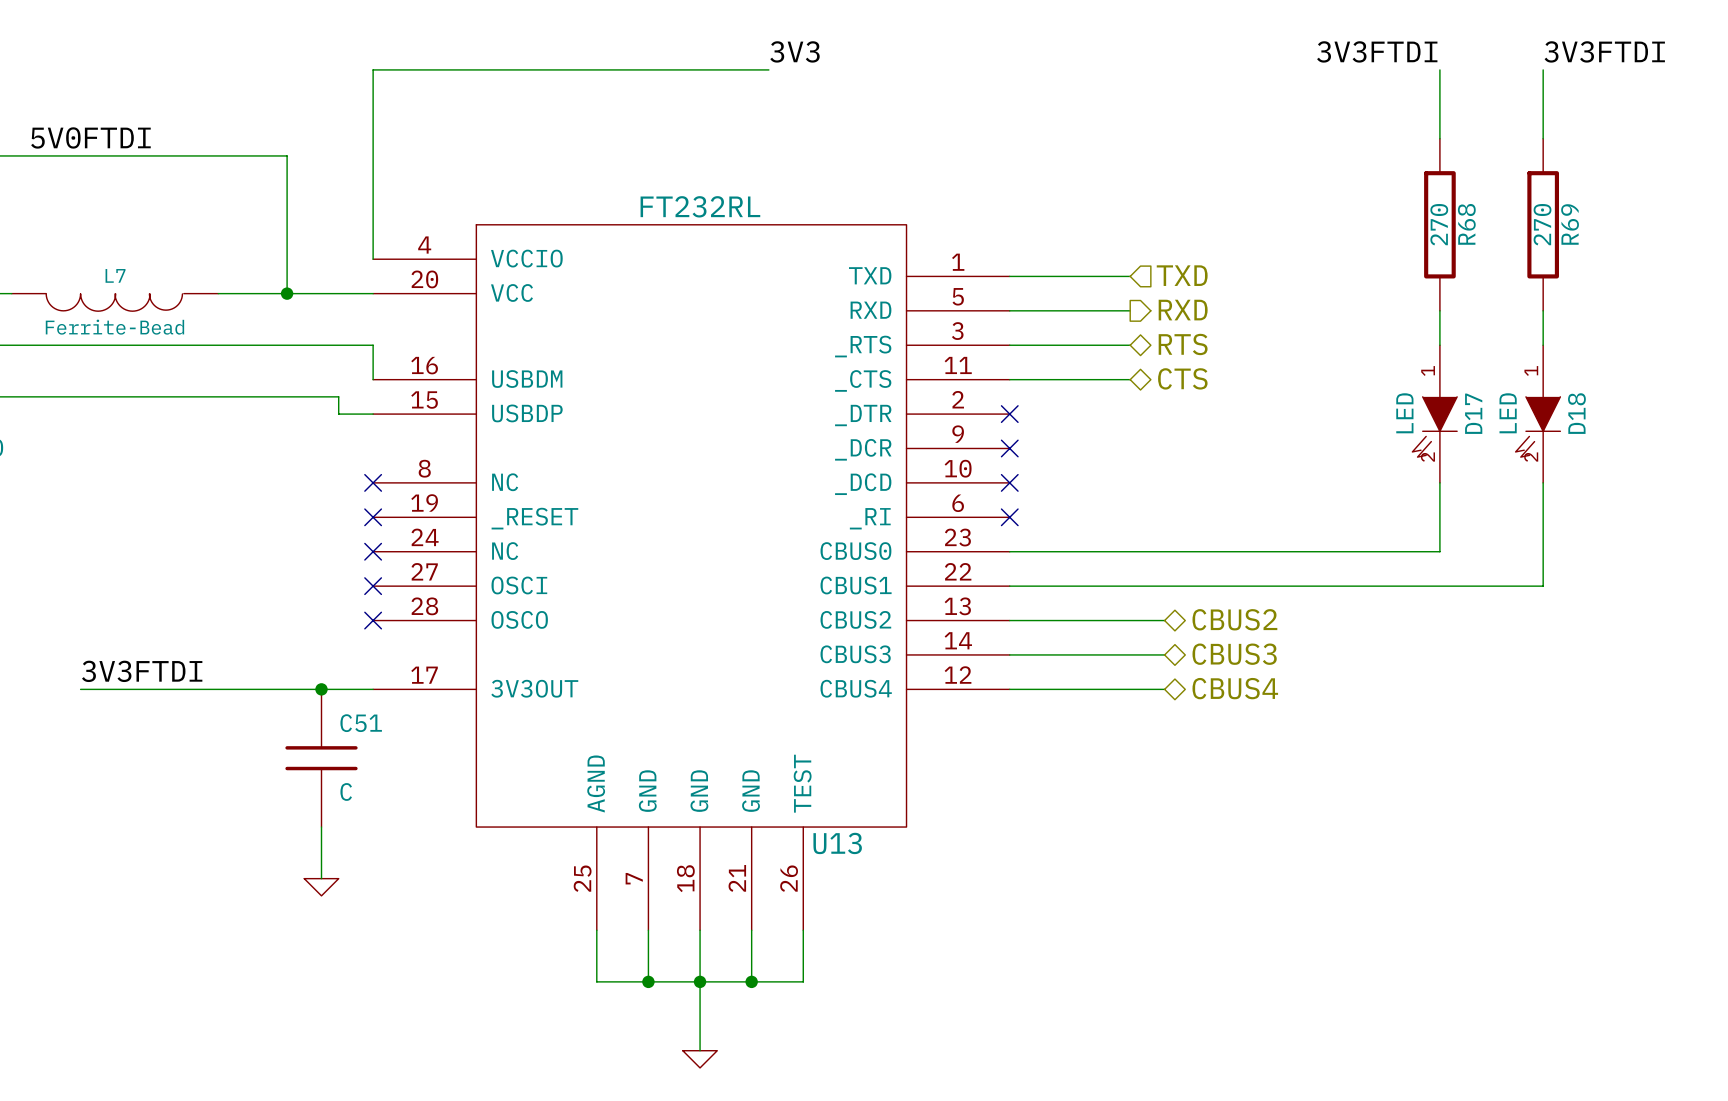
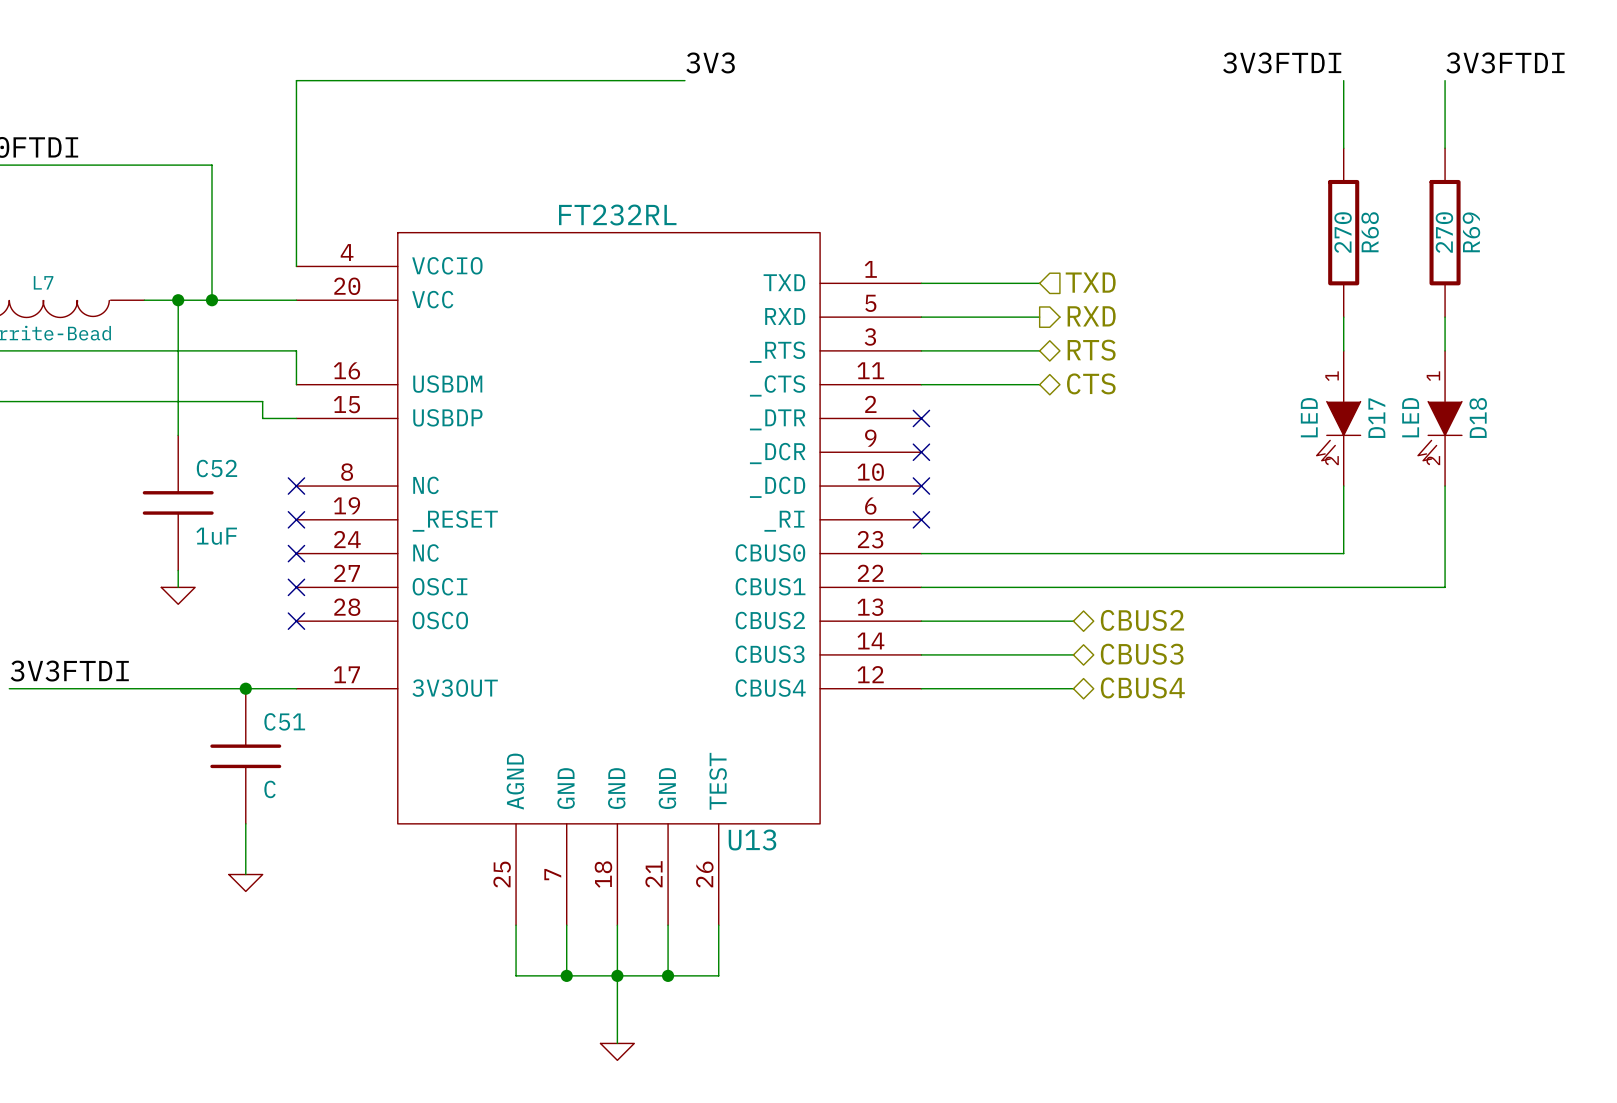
wire: none -> (178, 300) (178, 435)
junction: none -> (178, 300)
C52: none -> 1uF (178, 502)
wire: none -> (178, 570) (178, 587)
power symbol: none -> (178, 595)

